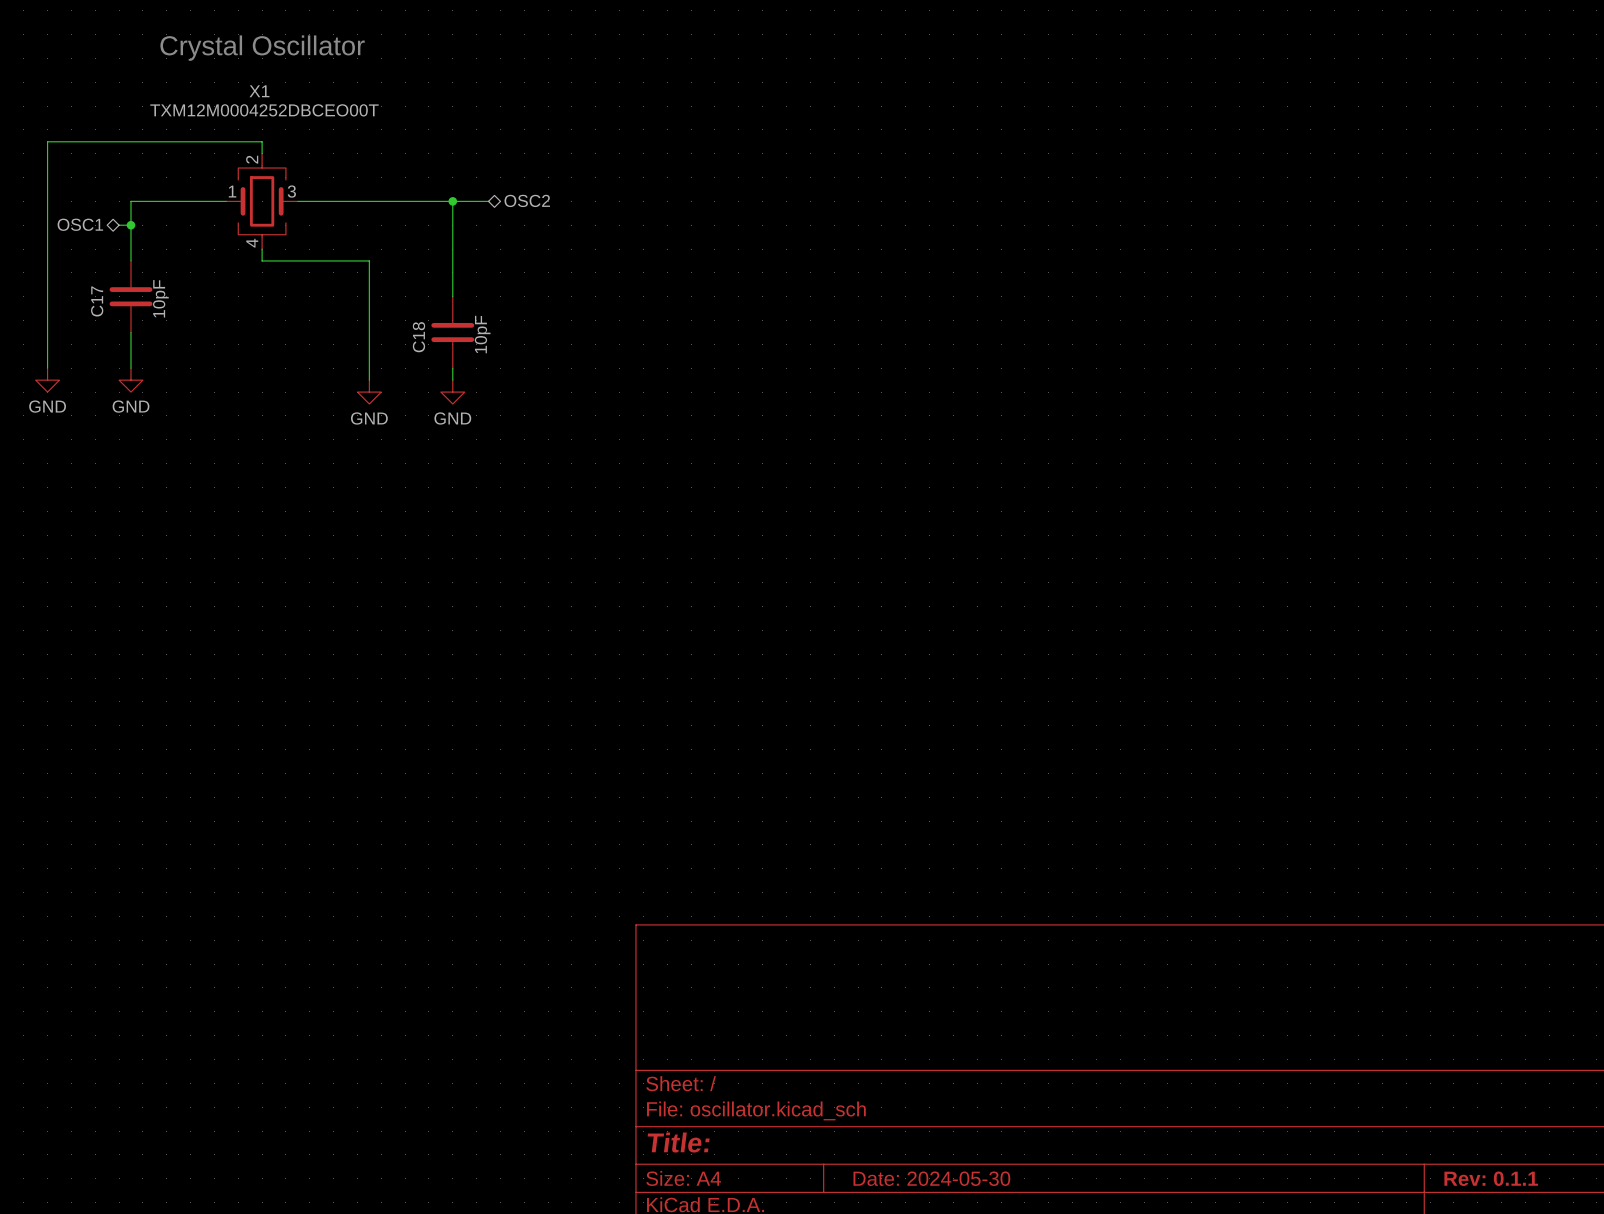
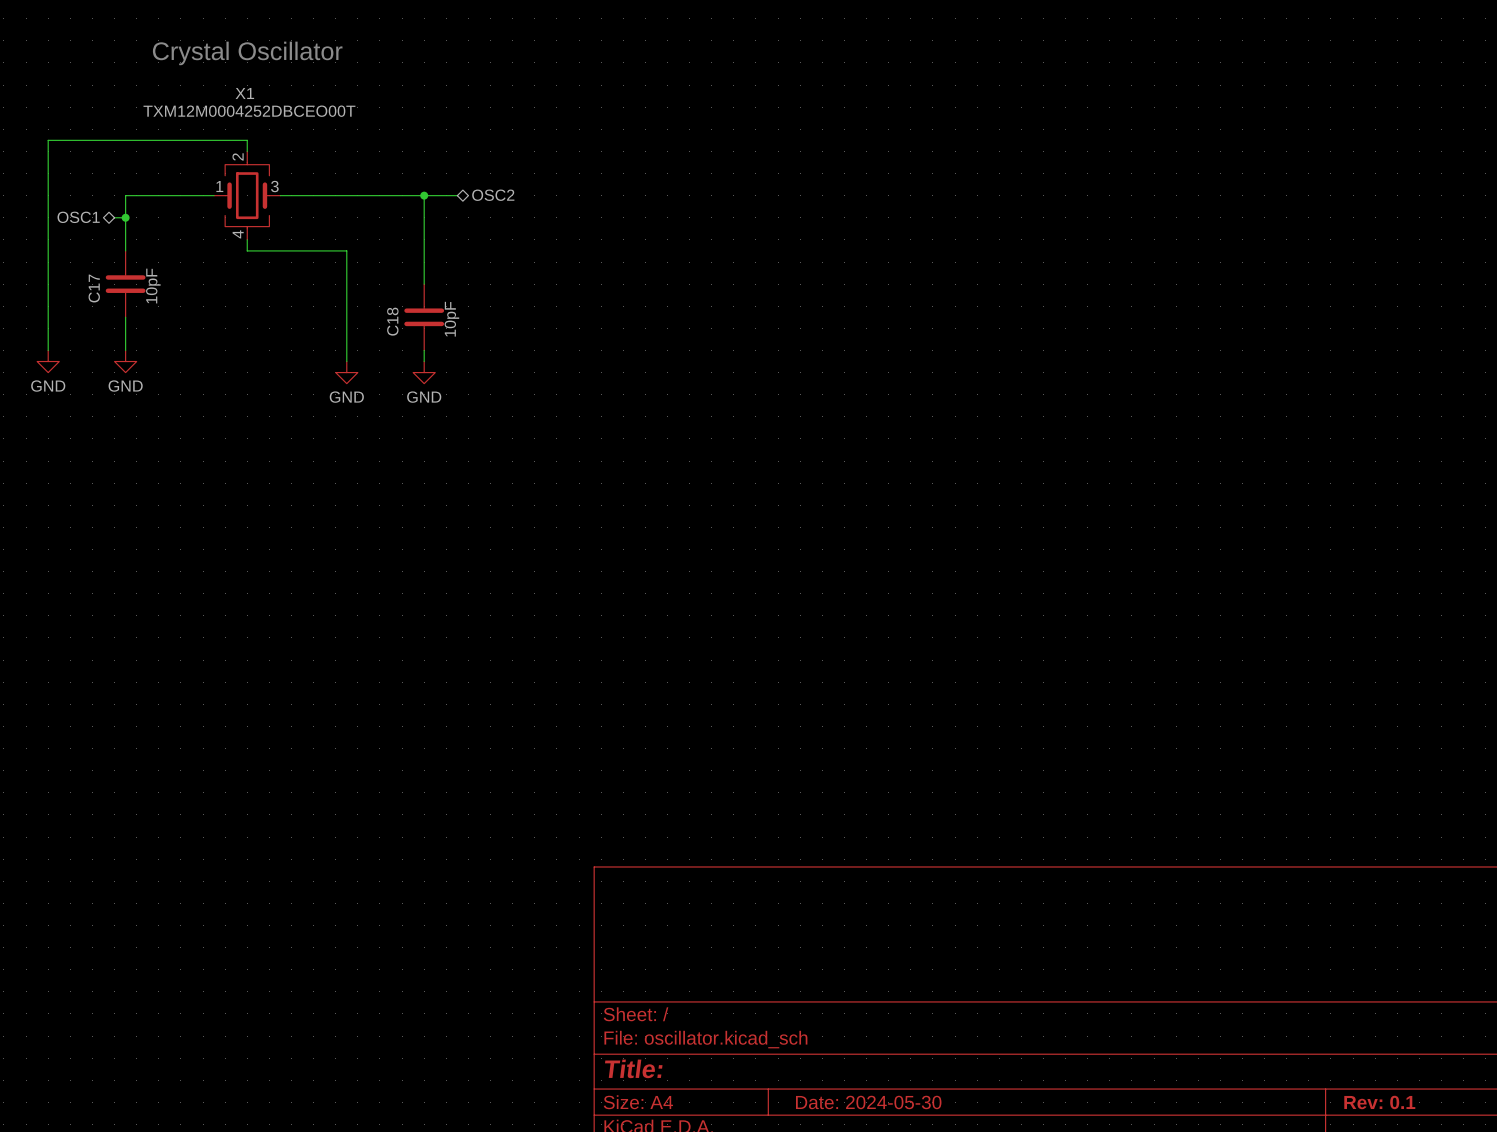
title block: Rev: 0.1.1 (1491, 1178) -> Rev: 0.1 (1379, 1102)

